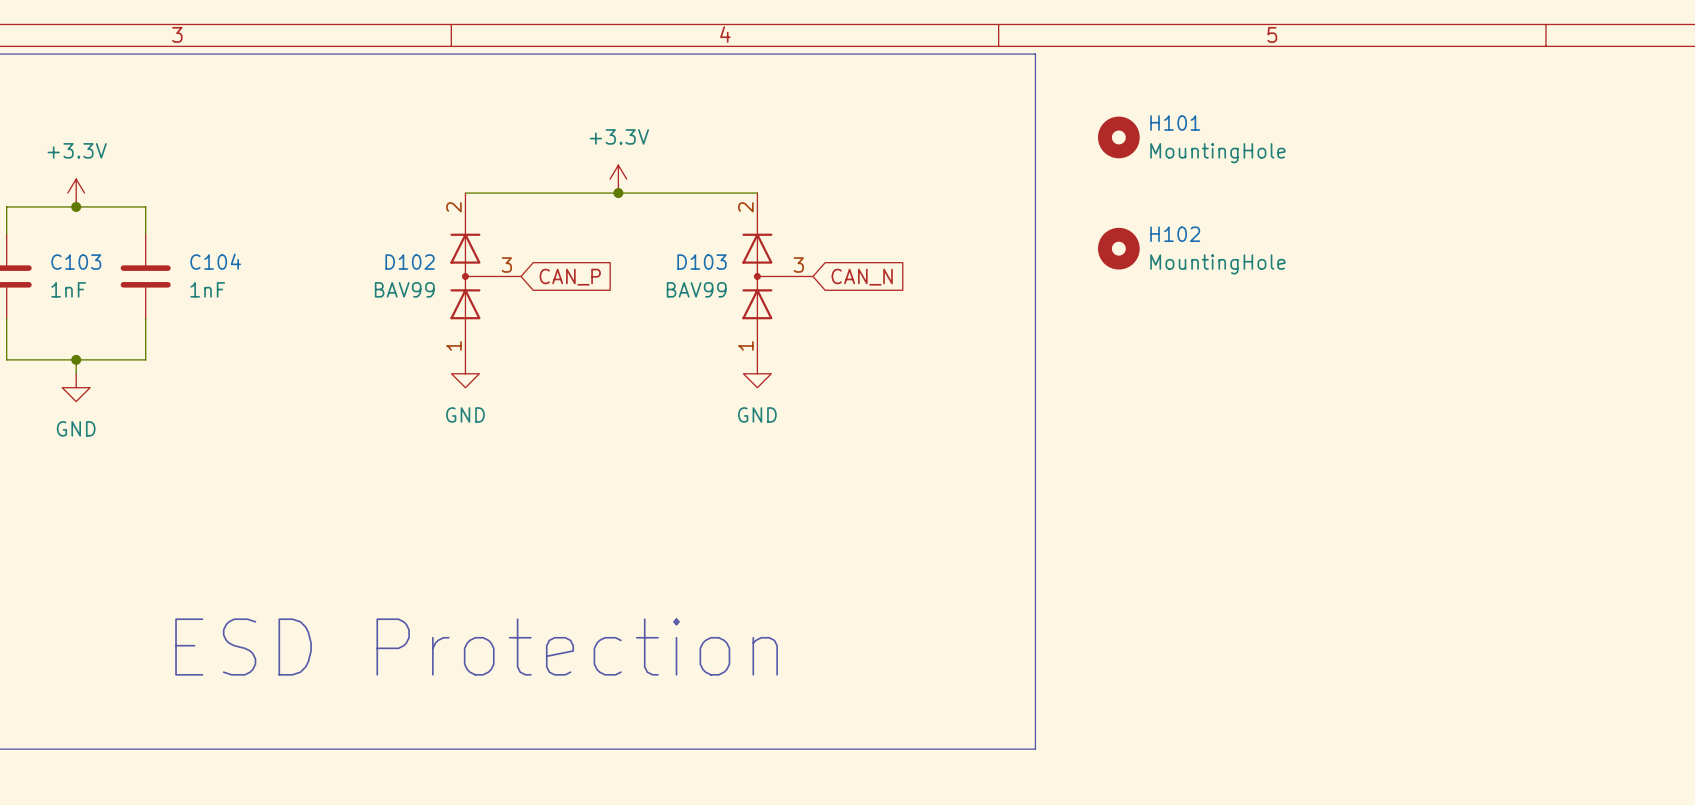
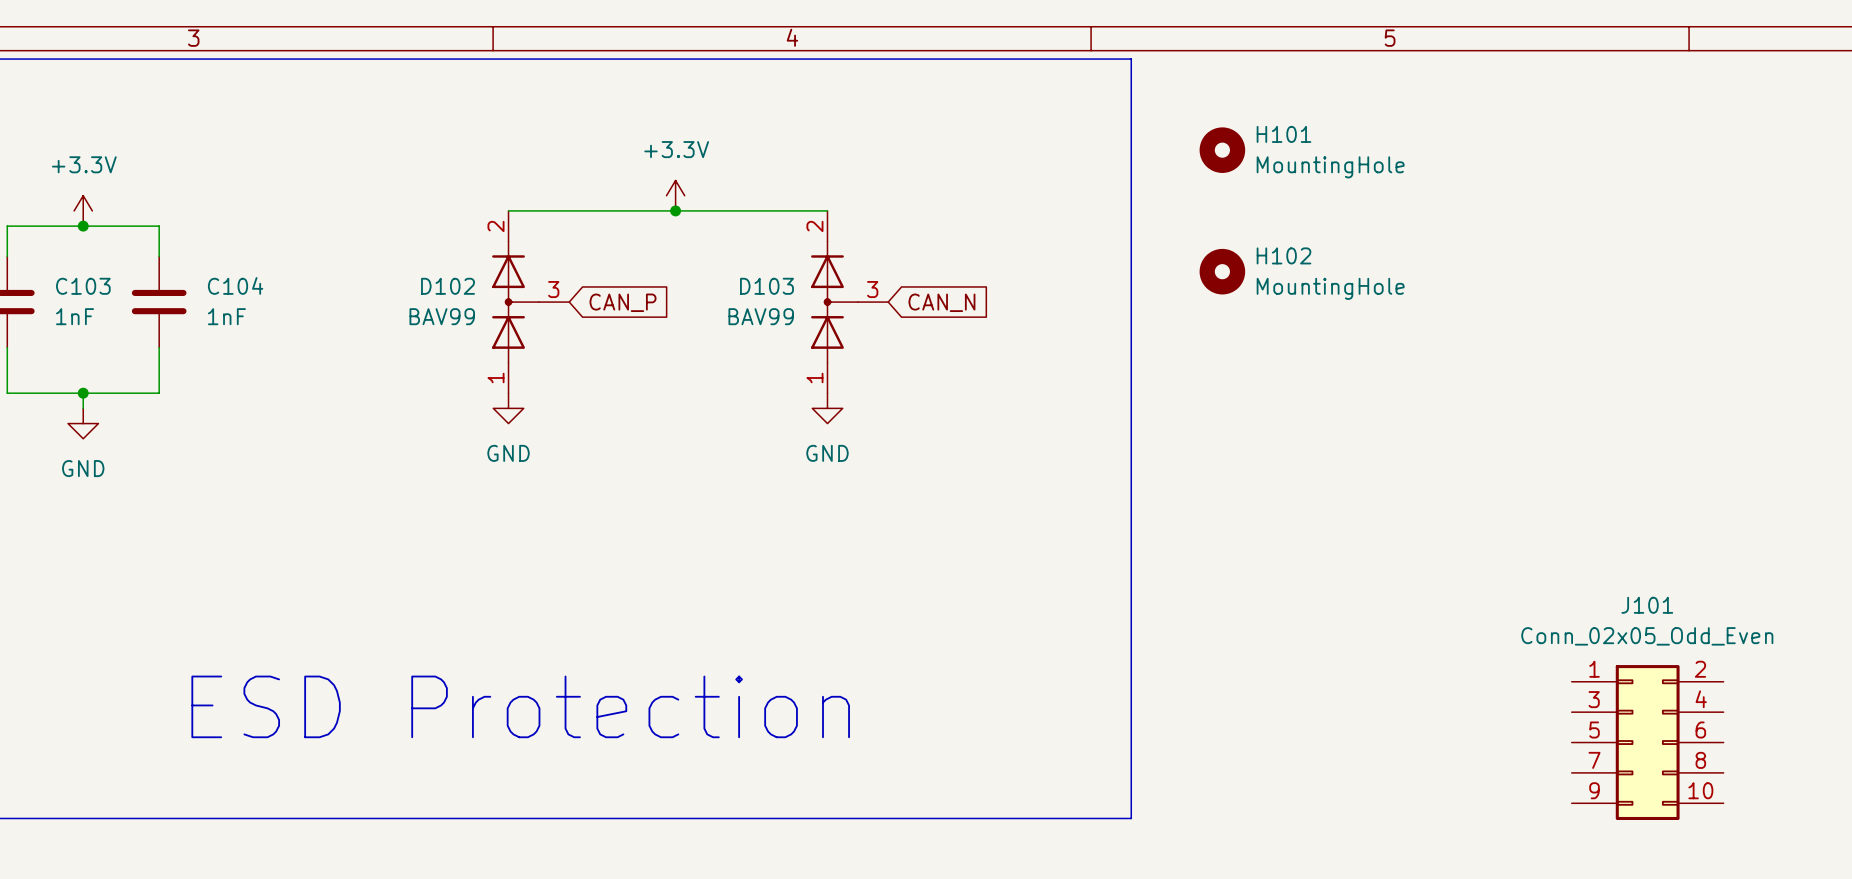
J101: none -> Conn_02x05_Odd_Even (1647, 742)

